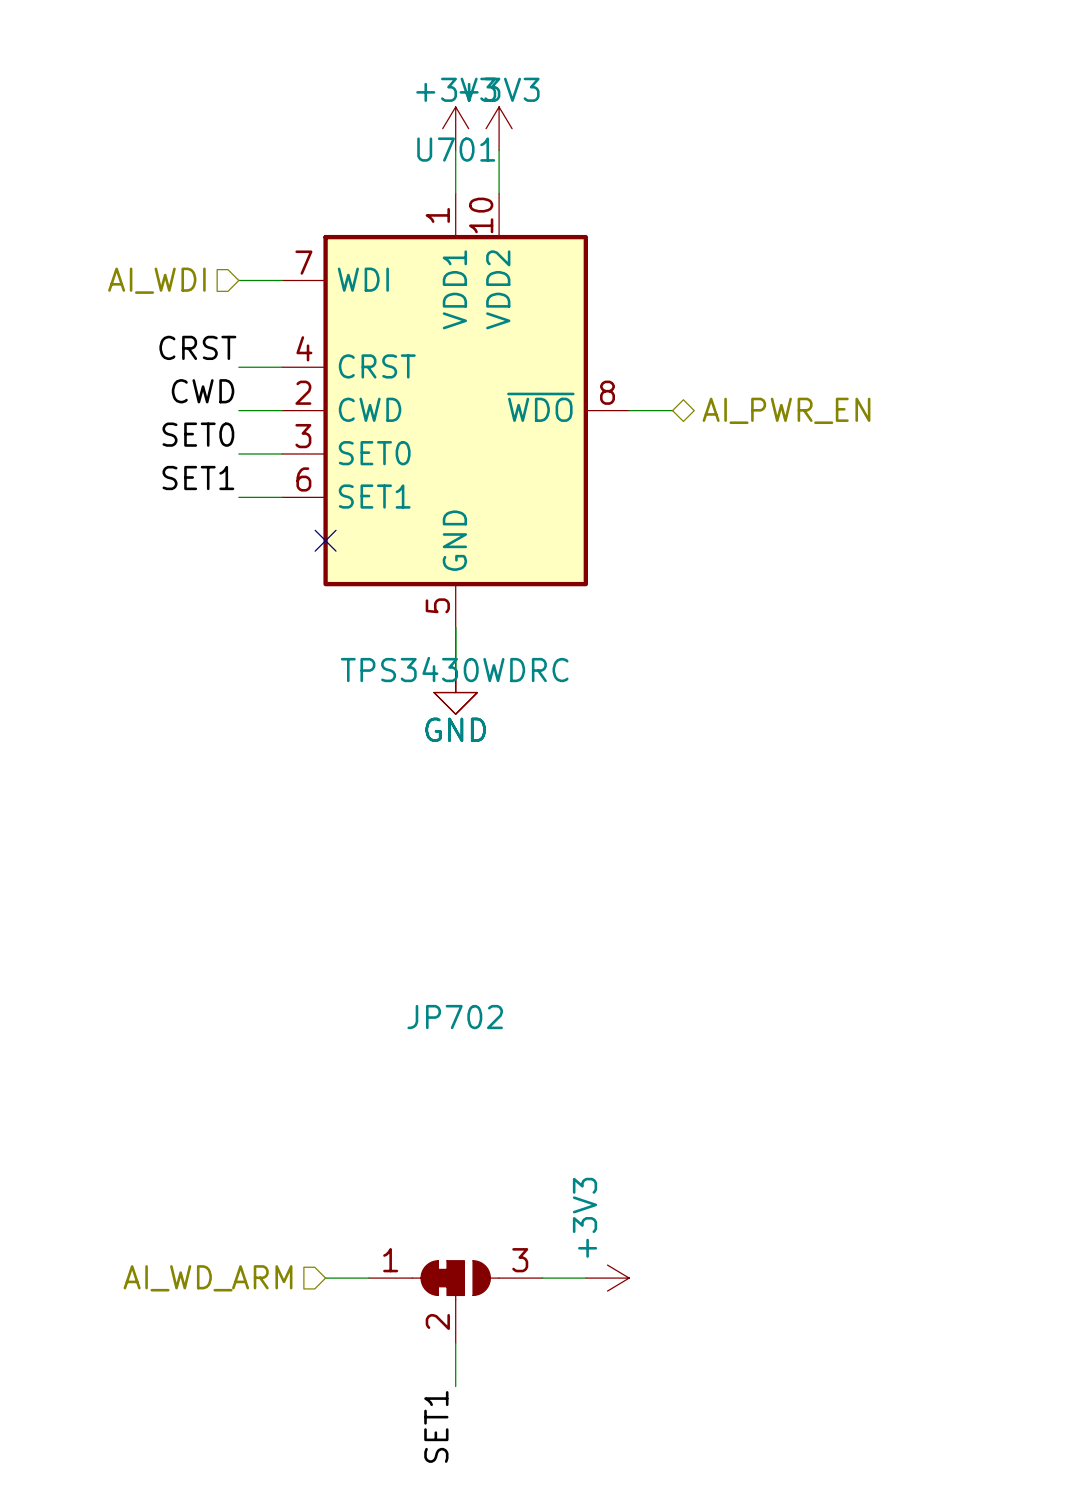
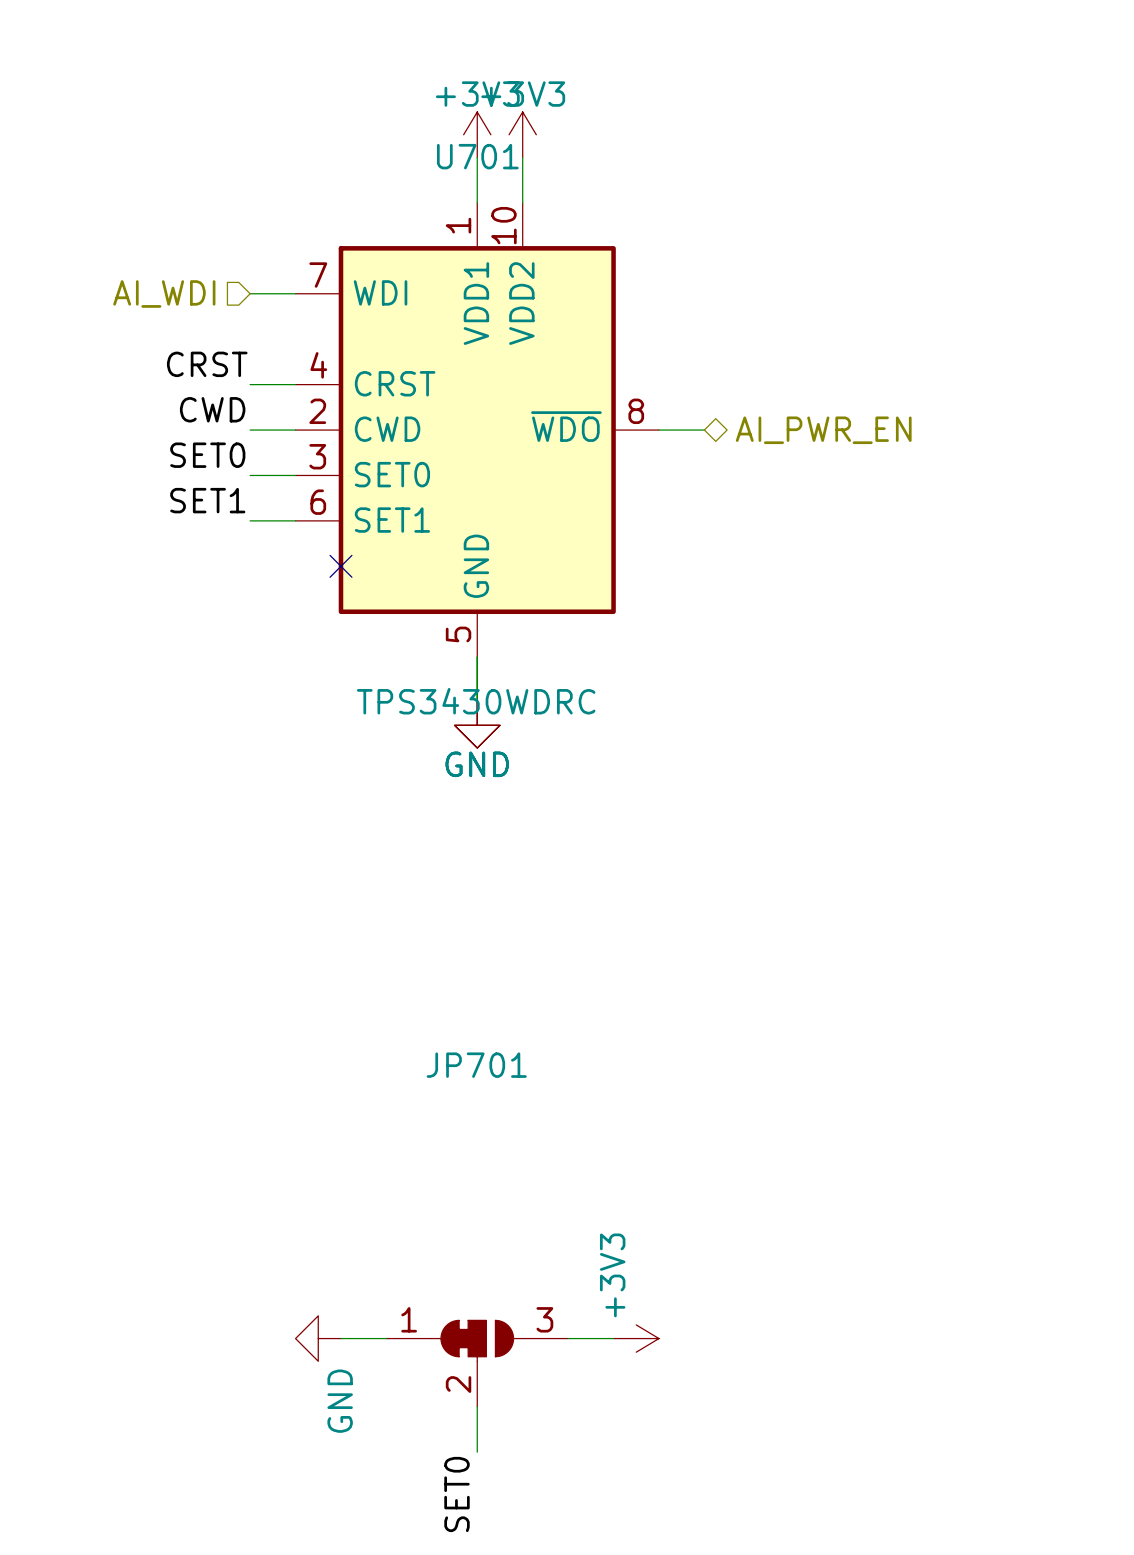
JP702 name: JP702 (455, 1017) -> JP701 (476, 1065)
hierarchical label: AI_WD_ARM (208, 1278) -> none
power symbol: none -> GND (318, 1338)
label: SET1 (436, 1426) -> SET0 (457, 1494)

